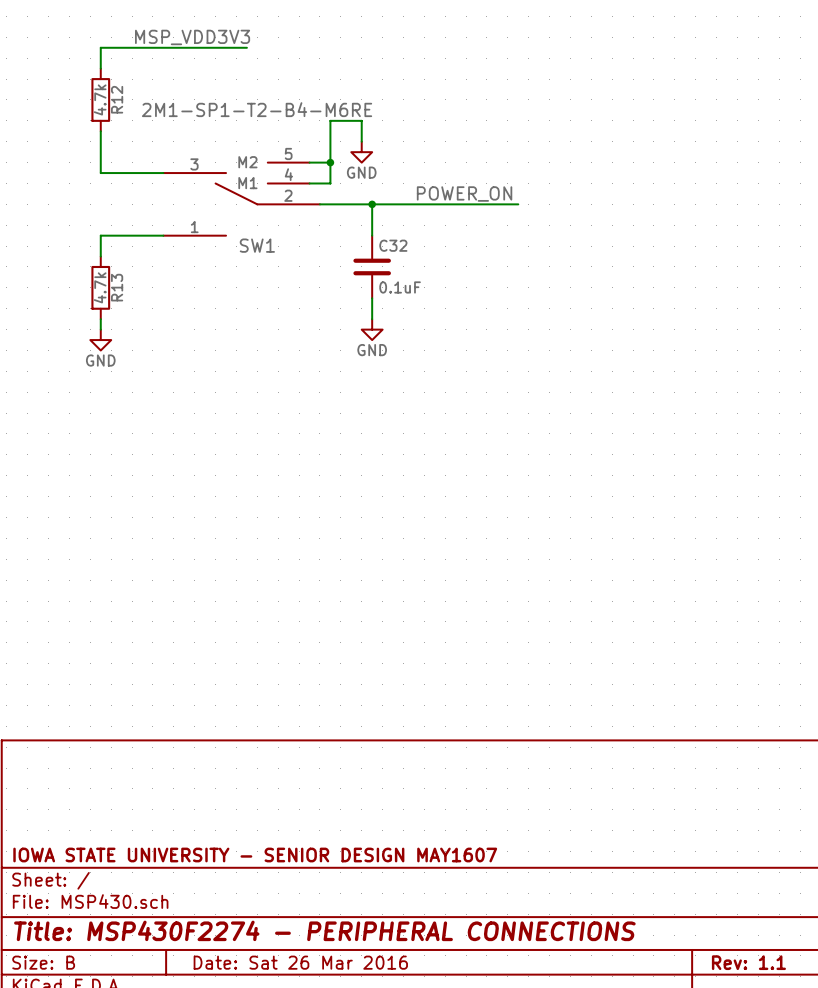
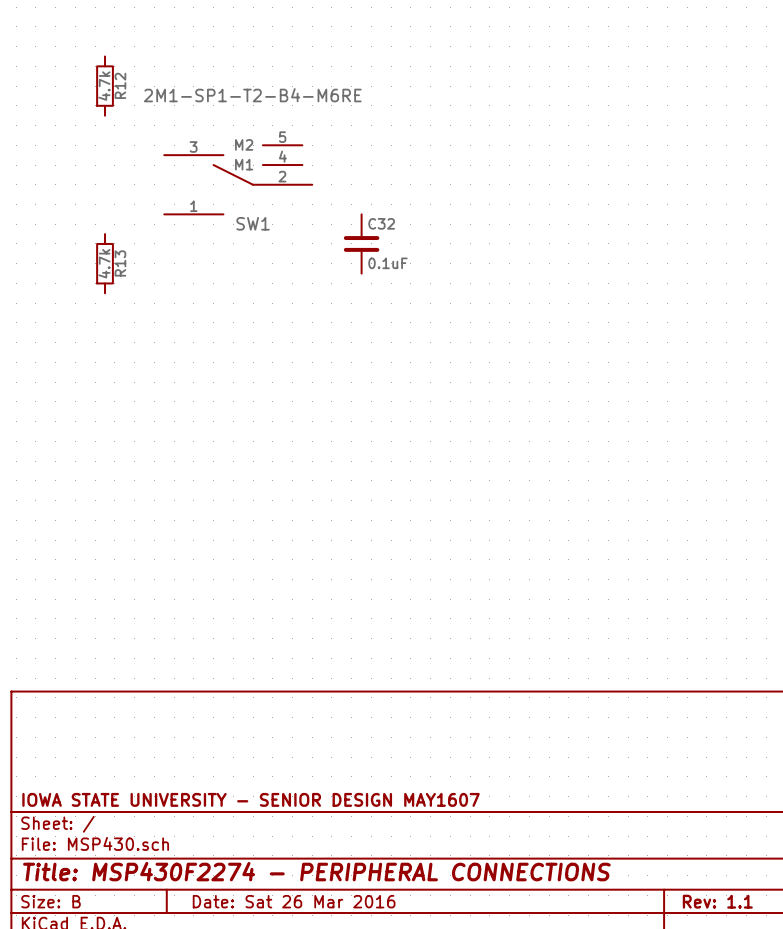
label: MSP_VDD3V3 (192, 37) -> none
wire: (246, 47) (100, 47) (100, 68) -> none
wire: (100, 131) (100, 173) (163, 173) -> none
wire: (361, 141) (361, 120) (330, 120) (330, 183) (309, 183) -> none
power symbol: GND (361, 152) -> none
wire: (309, 162) (330, 162) -> none
junction: (330, 162) -> none
label: POWER_ON (464, 194) -> none
wire: (319, 204) (518, 204) -> none
wire: (372, 204) (372, 235) -> none
junction: (372, 204) -> none
wire: (163, 235) (100, 235) (100, 256) -> none
wire: (372, 298) (372, 319) -> none
wire: (100, 319) (100, 329) -> none
power symbol: GND (372, 329) -> none
power symbol: GND (100, 340) -> none

